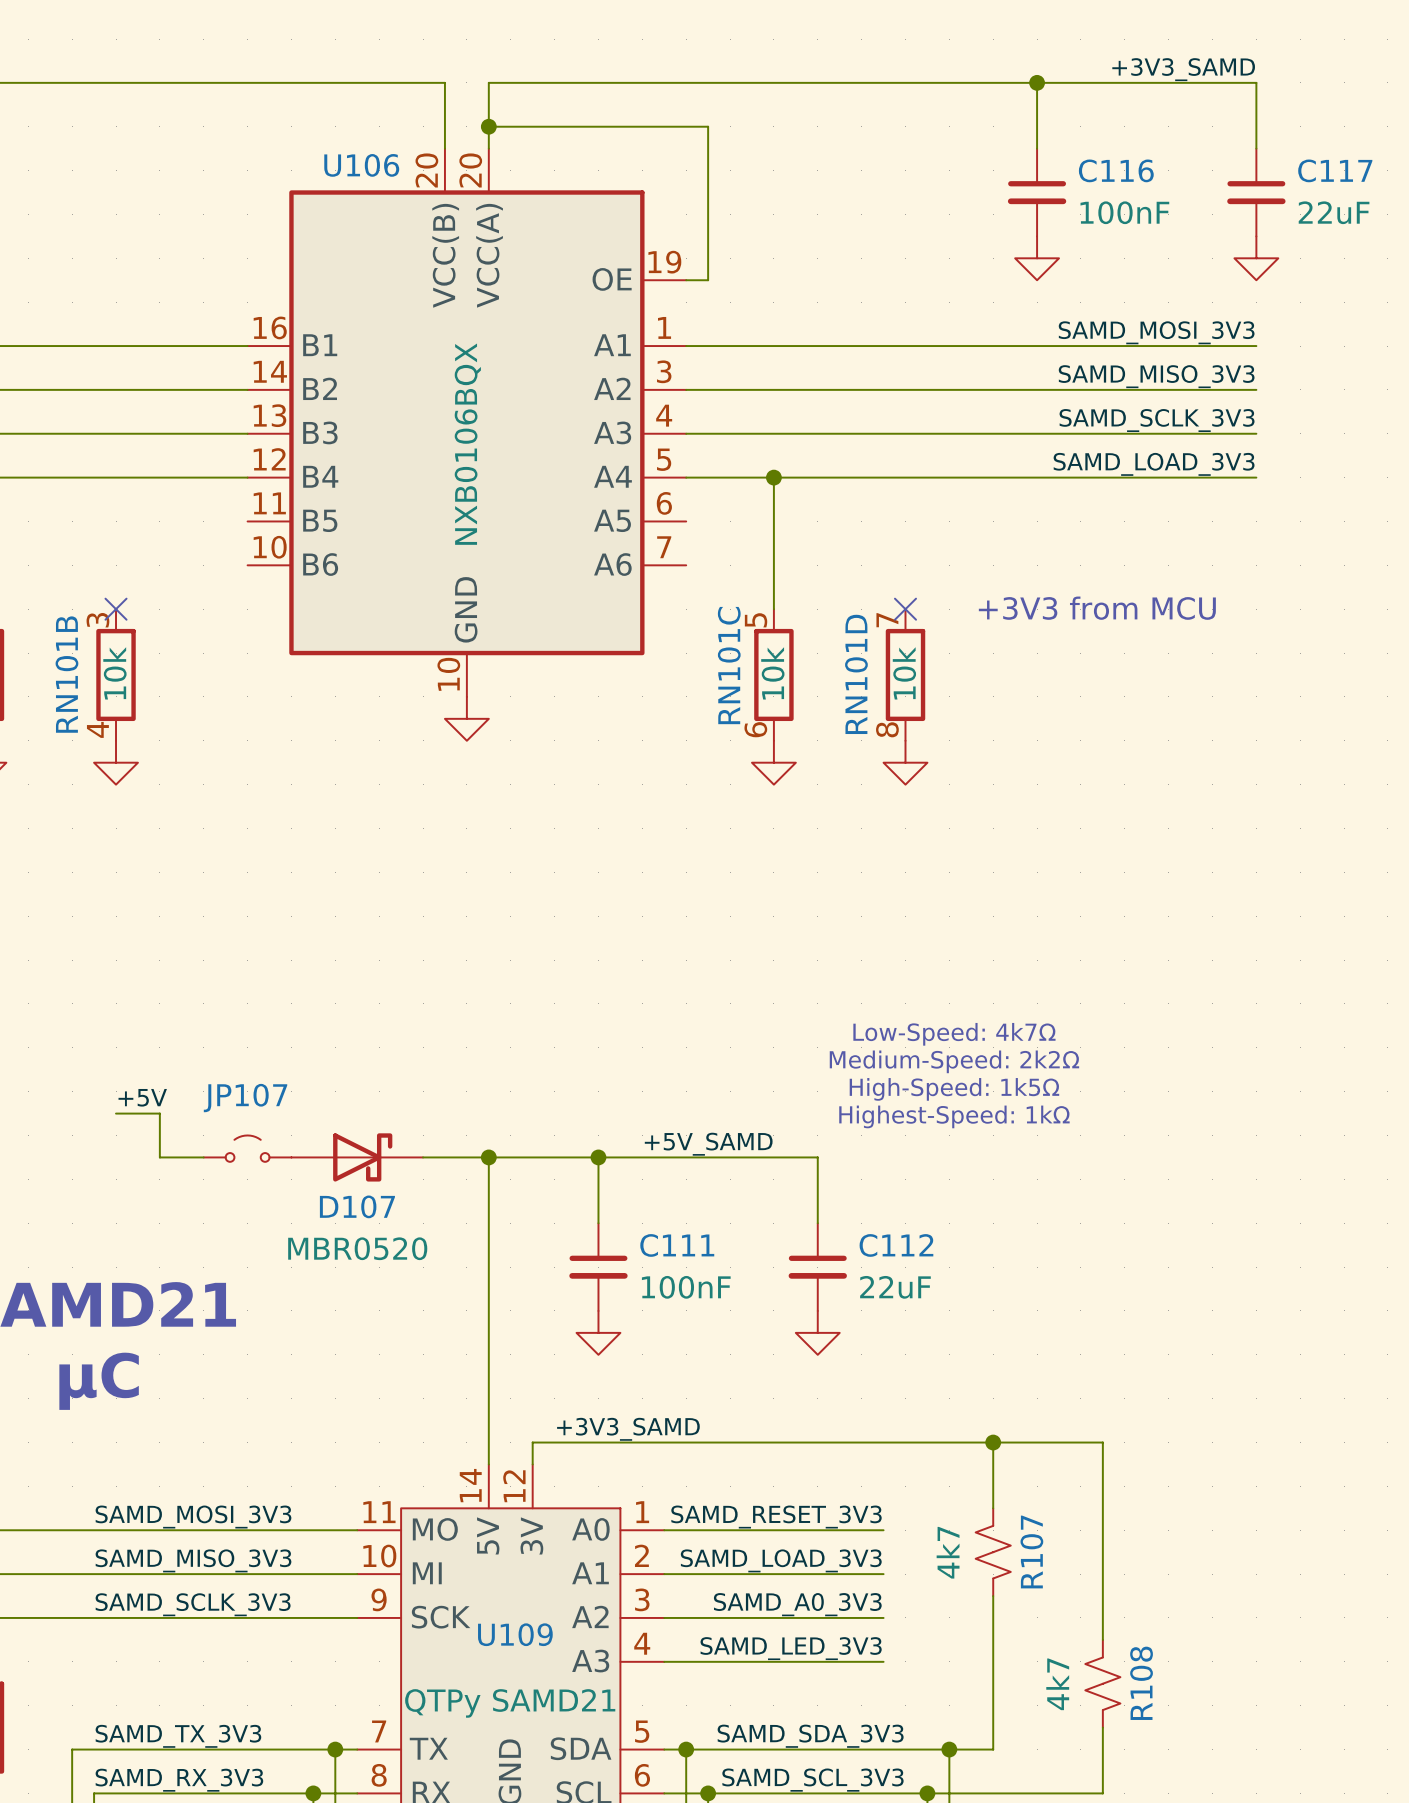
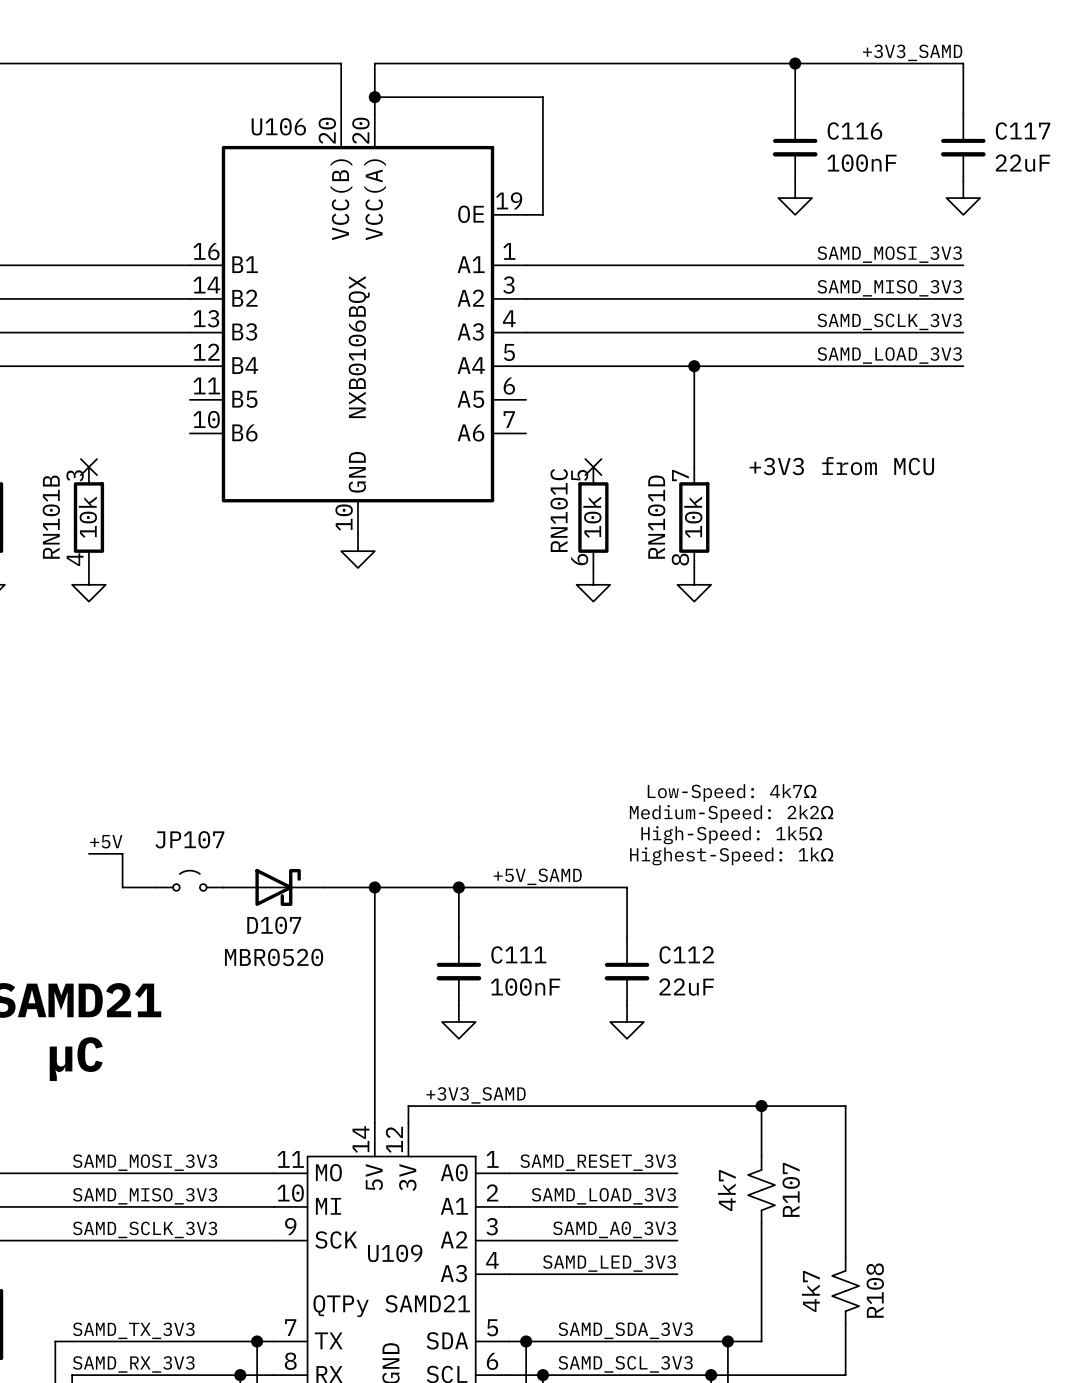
wire: (773, 477) (773, 609) -> (694, 366) (694, 467)
junction: (773, 477) -> none
junction: none -> (694, 366)
no-connect mark: none -> (593, 467)
no-connect mark: (905, 609) -> none

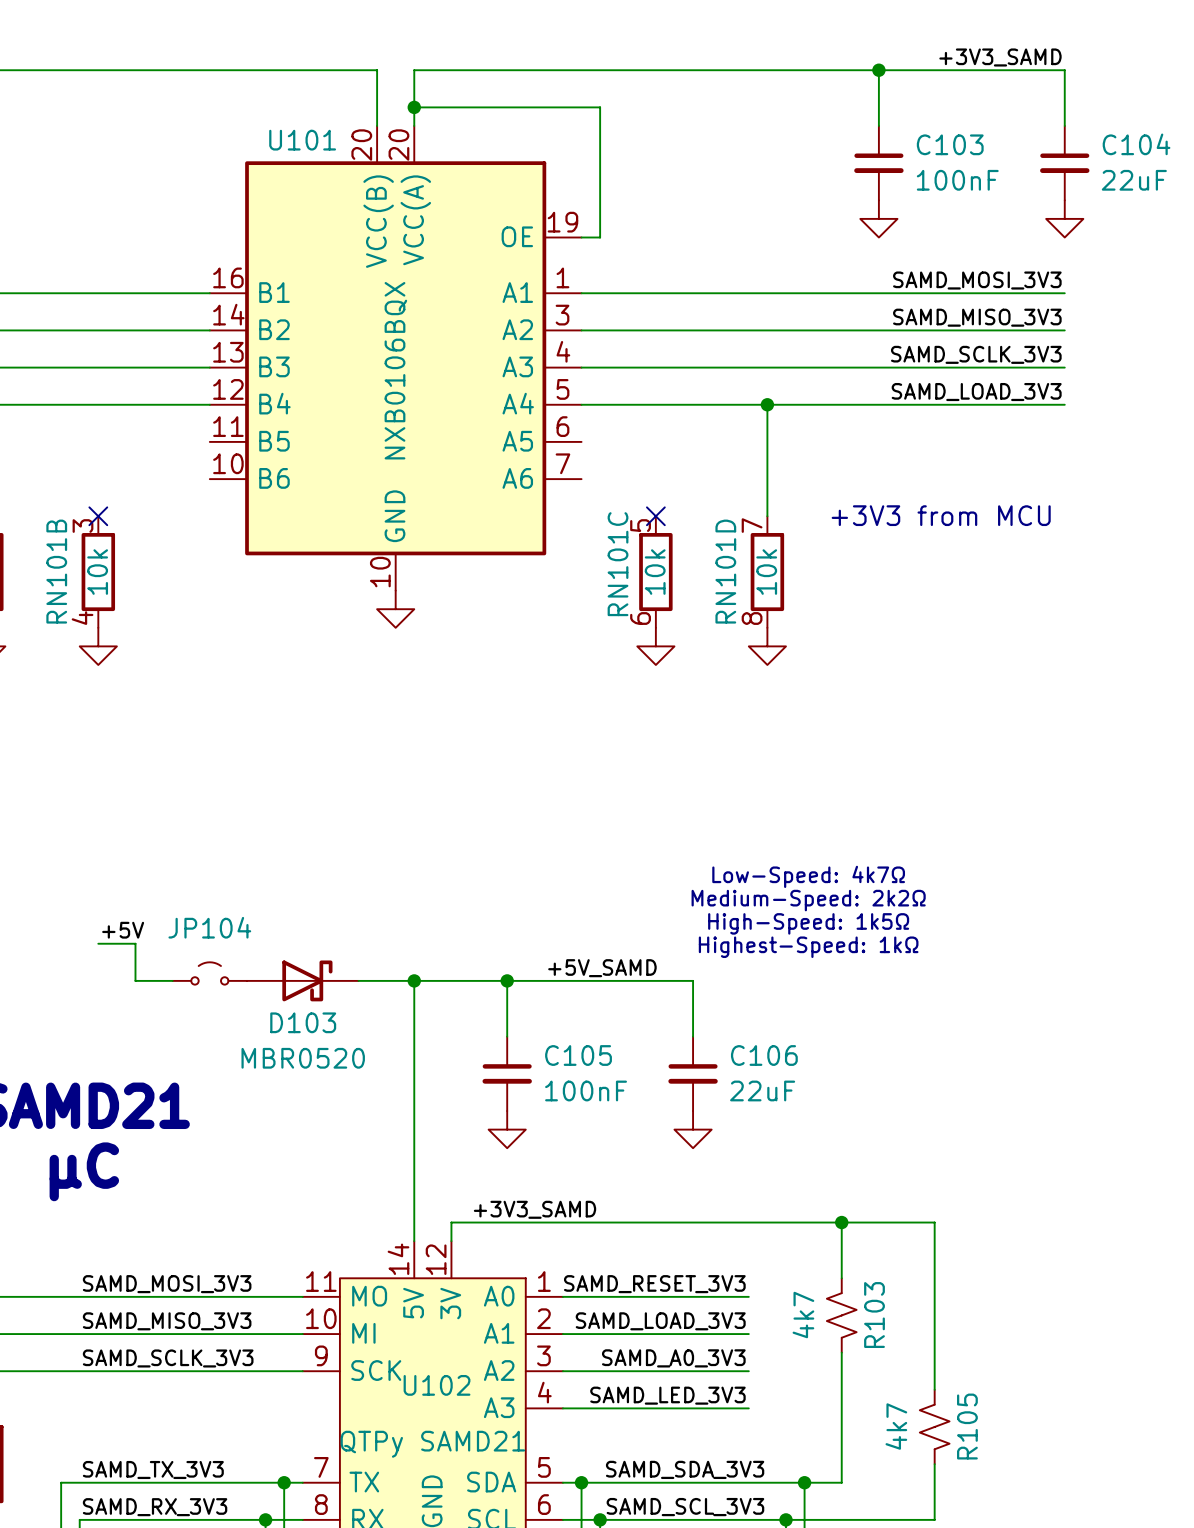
U106 name: U106 (278, 126) -> U101 (302, 140)
C116 name: C116 (854, 131) -> C103 (950, 144)
C117 name: C117 (1023, 131) -> C104 (1136, 144)
JP107 name: JP107 (189, 839) -> JP104 (209, 927)
D107 name: D107 (274, 925) -> D103 (303, 1022)
C111 name: C111 (518, 954) -> C105 (578, 1055)
C112 name: C112 (686, 954) -> C106 (764, 1055)
R107 name: R107 (791, 1189) -> R103 (874, 1315)
U109 name: U109 (395, 1253) -> U102 (437, 1385)
R108 name: R108 (875, 1290) -> R105 (967, 1426)

